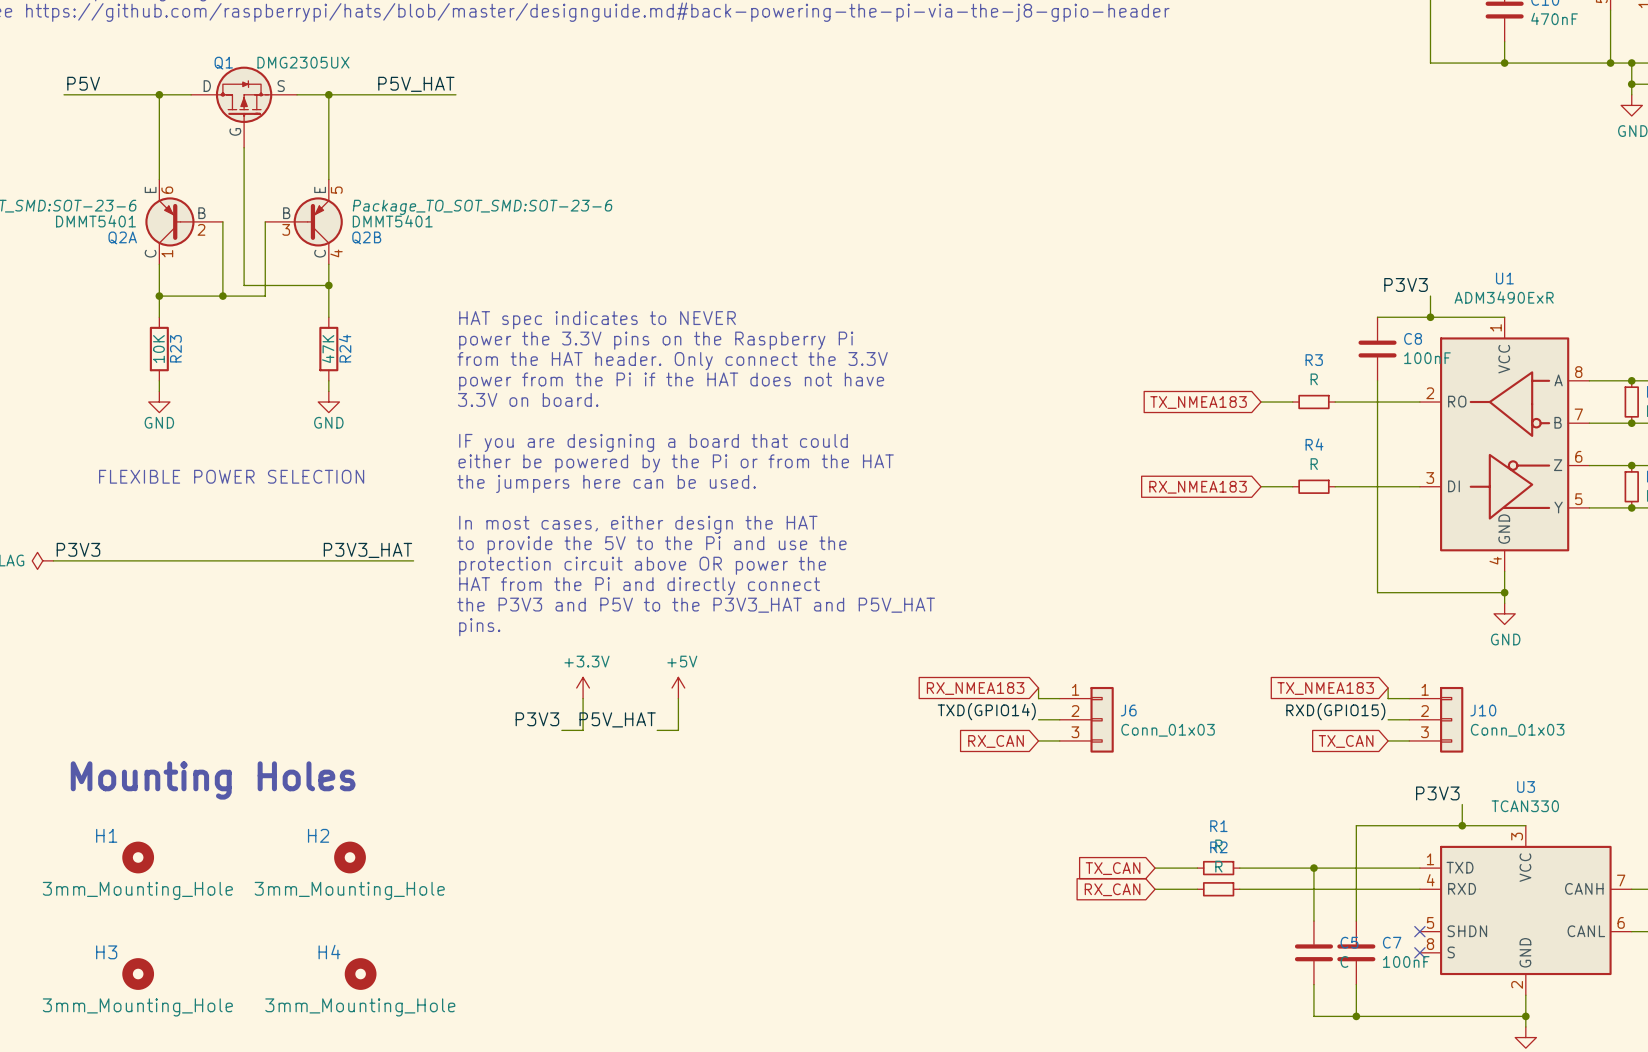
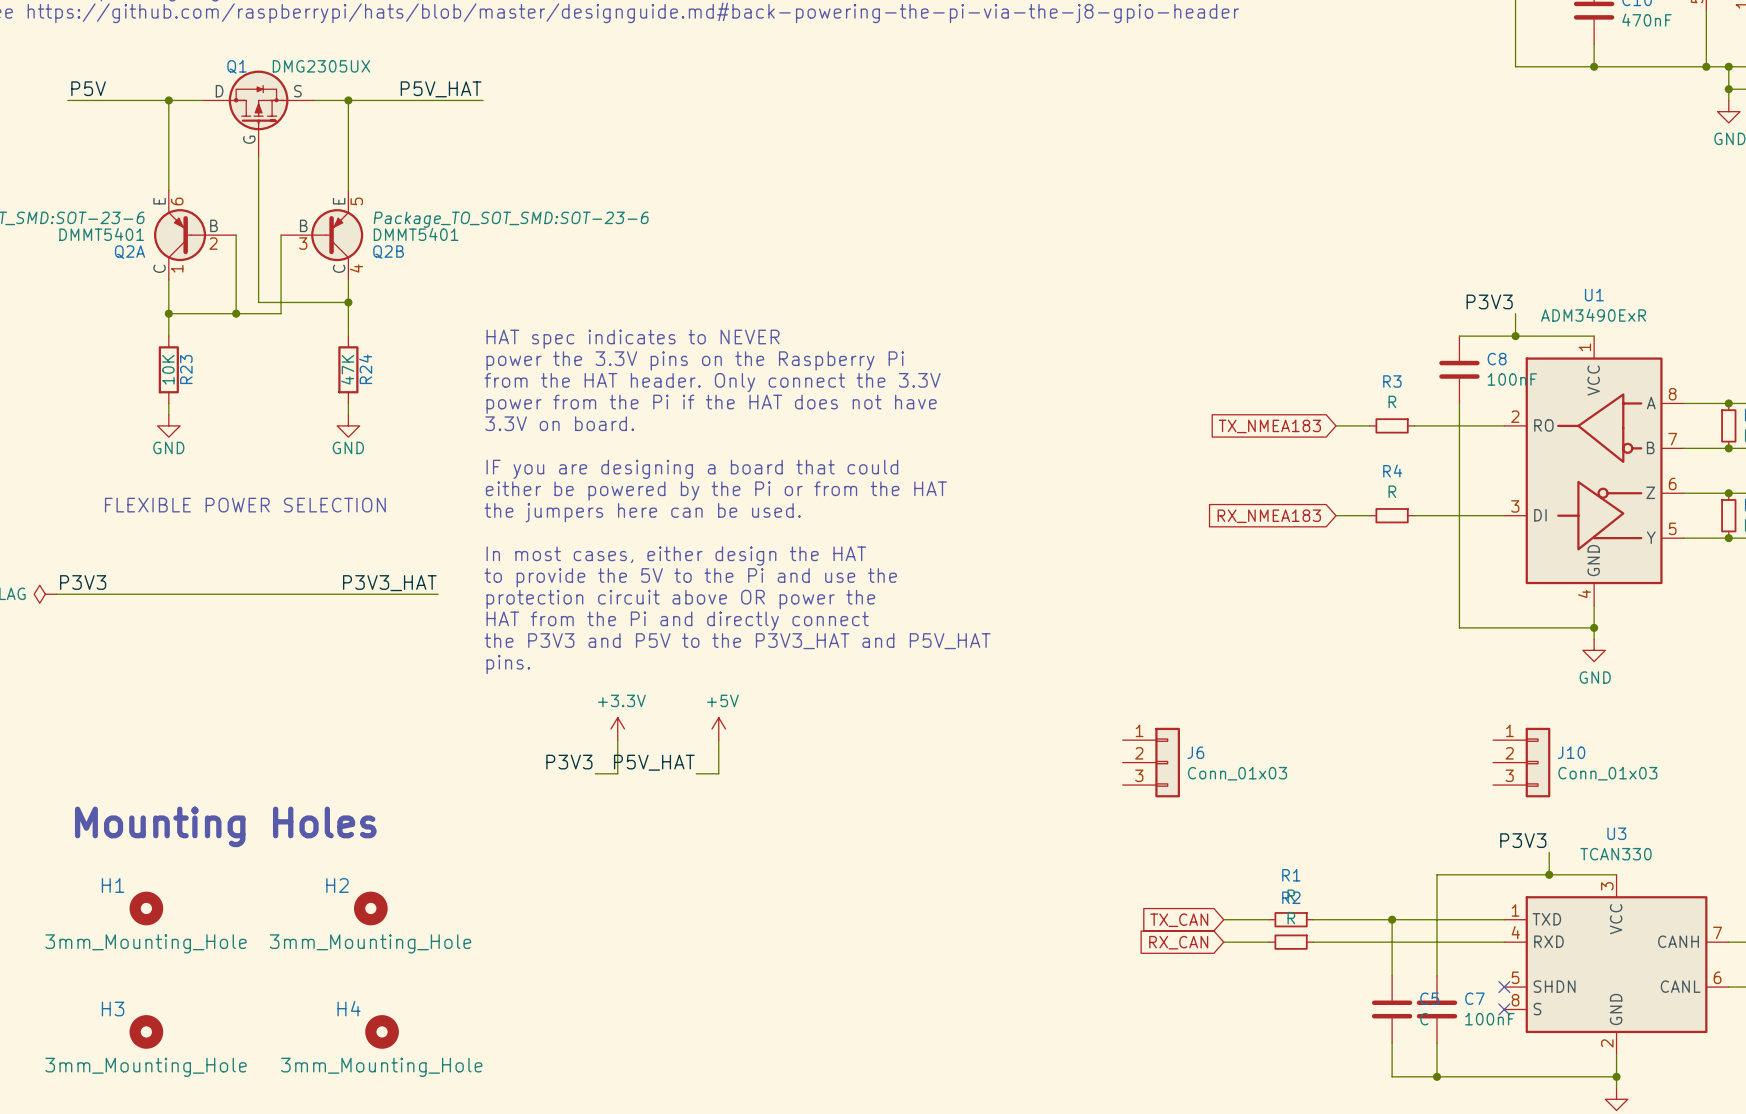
global label: RX_NMEA183 (975, 688) -> none
wire: (1038, 688) (1038, 698) (1059, 698) -> none
global label: TX_NMEA183 (1325, 688) -> none
wire: (1388, 688) (1388, 698) (1409, 698) -> none
label: TXD(GPIO14) (986, 711) -> none
label: RXD(GPIO15) (1335, 711) -> none
wire: (1038, 719) (1059, 719) -> none
wire: (1388, 719) (1409, 719) -> none
wire: (1038, 740) (1059, 740) -> none
wire: (1388, 740) (1409, 740) -> none
global label: RX_CAN (996, 741) -> none
global label: TX_CAN (1346, 741) -> none

